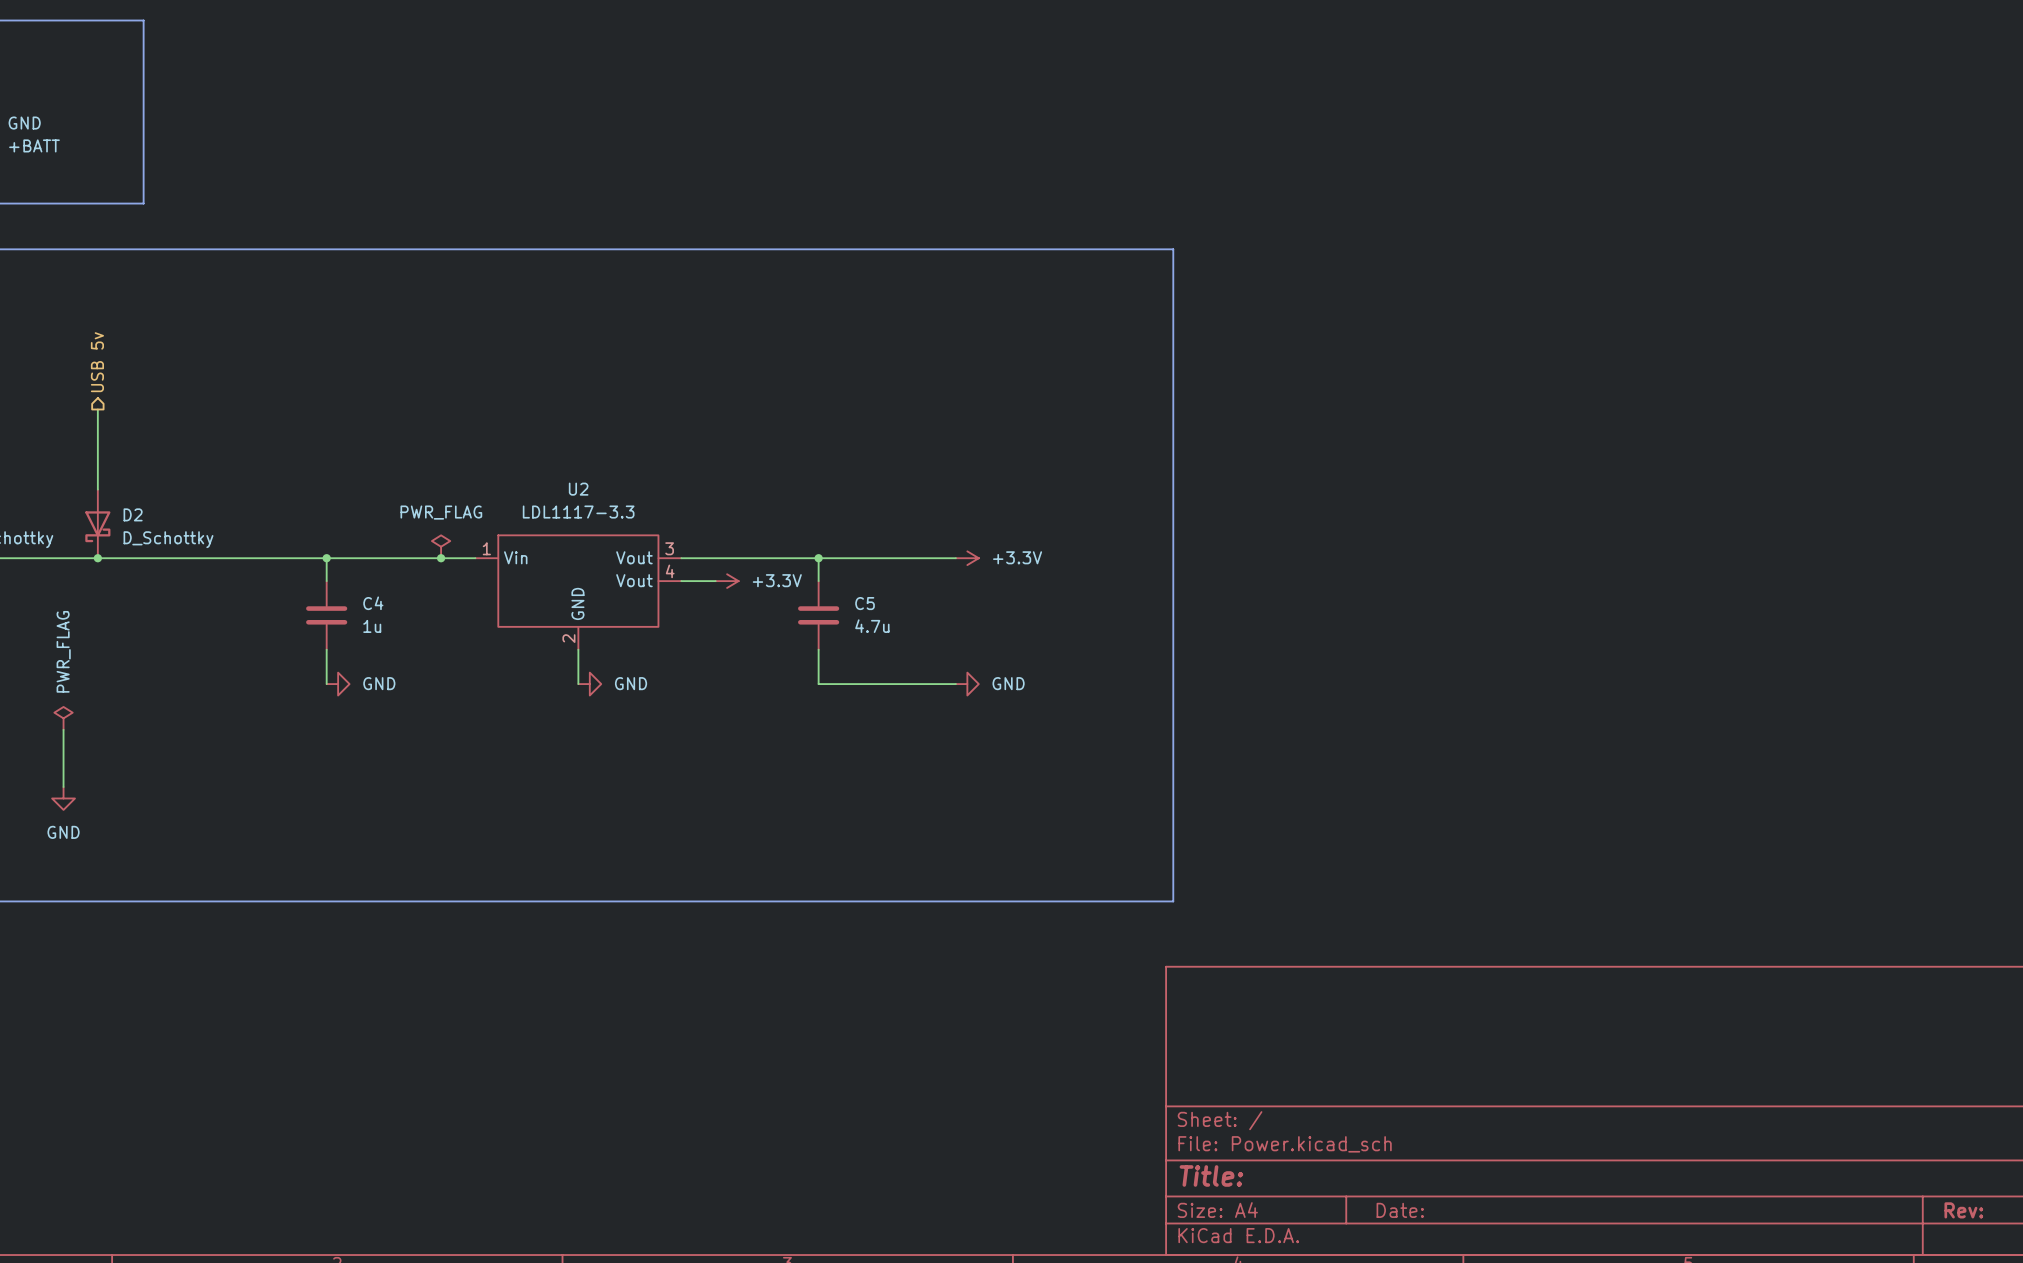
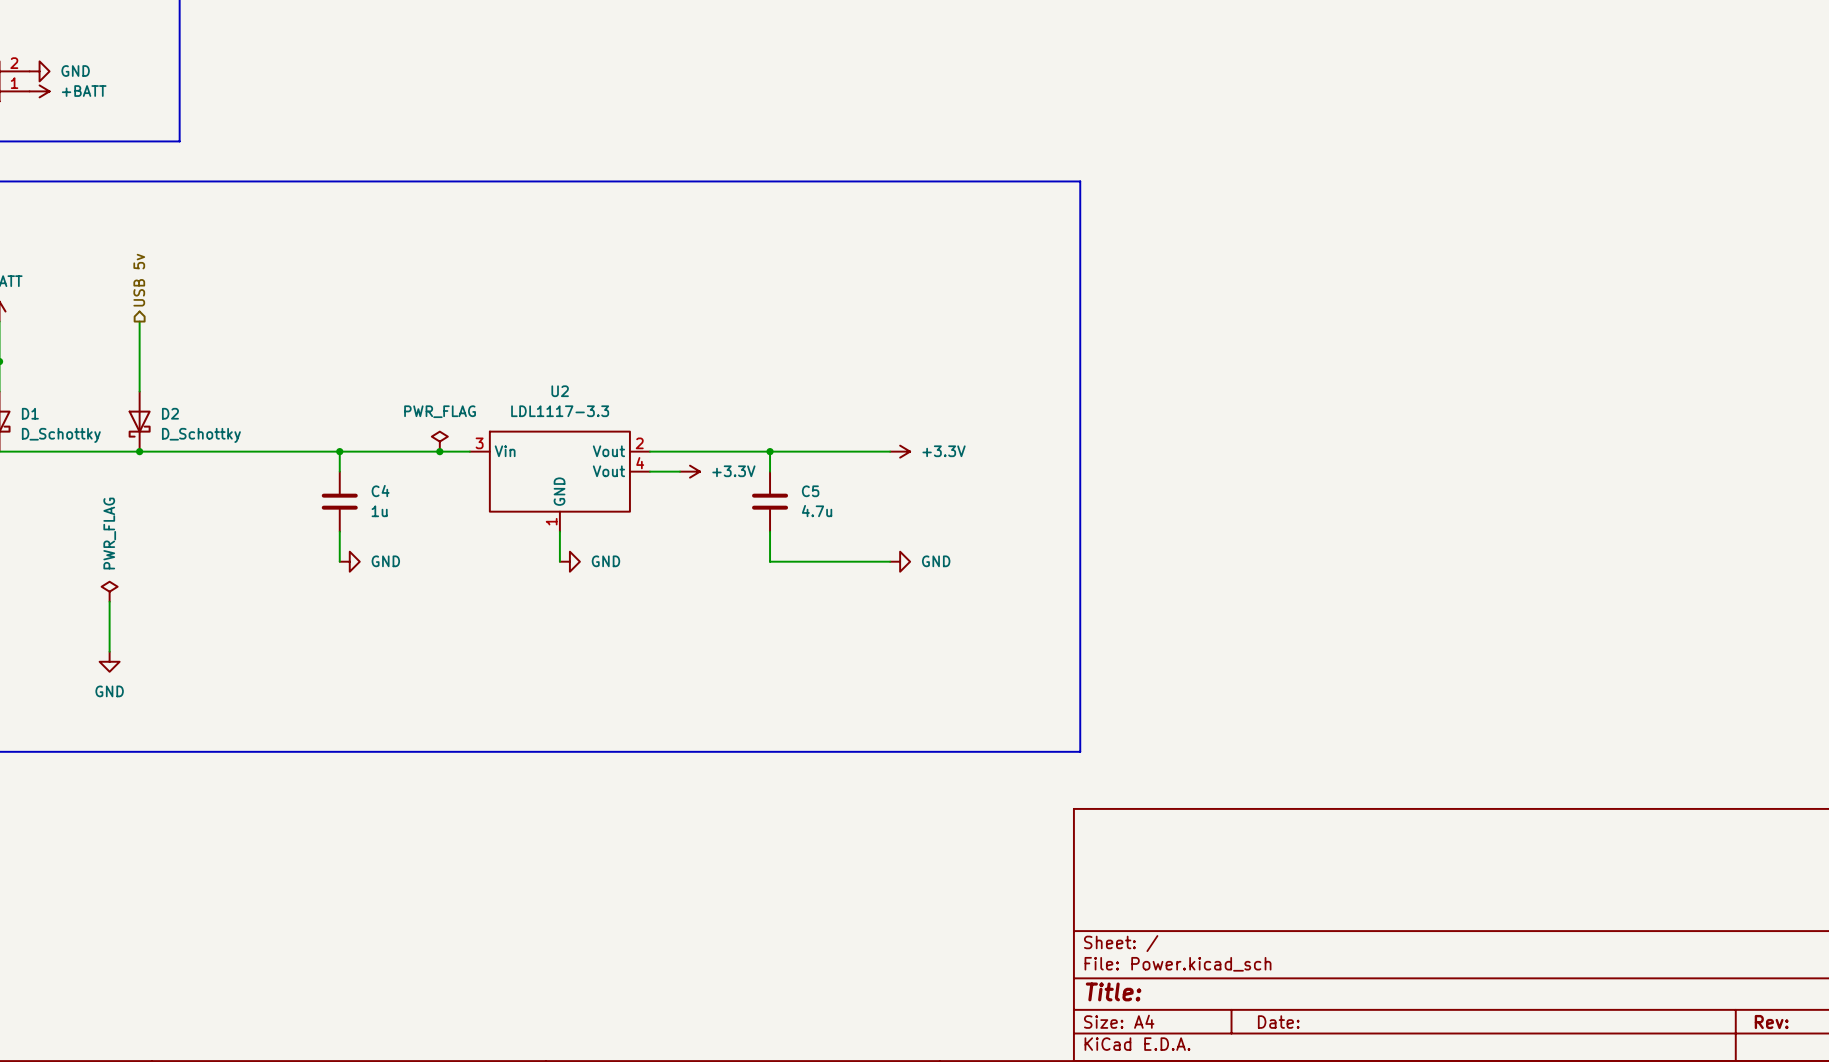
U2 pin number: 1 (486, 548) -> 3 (479, 443)
U2 pin number: 3 (669, 548) -> 2 (639, 443)
U2 pin number: 2 (568, 638) -> 1 (551, 521)

